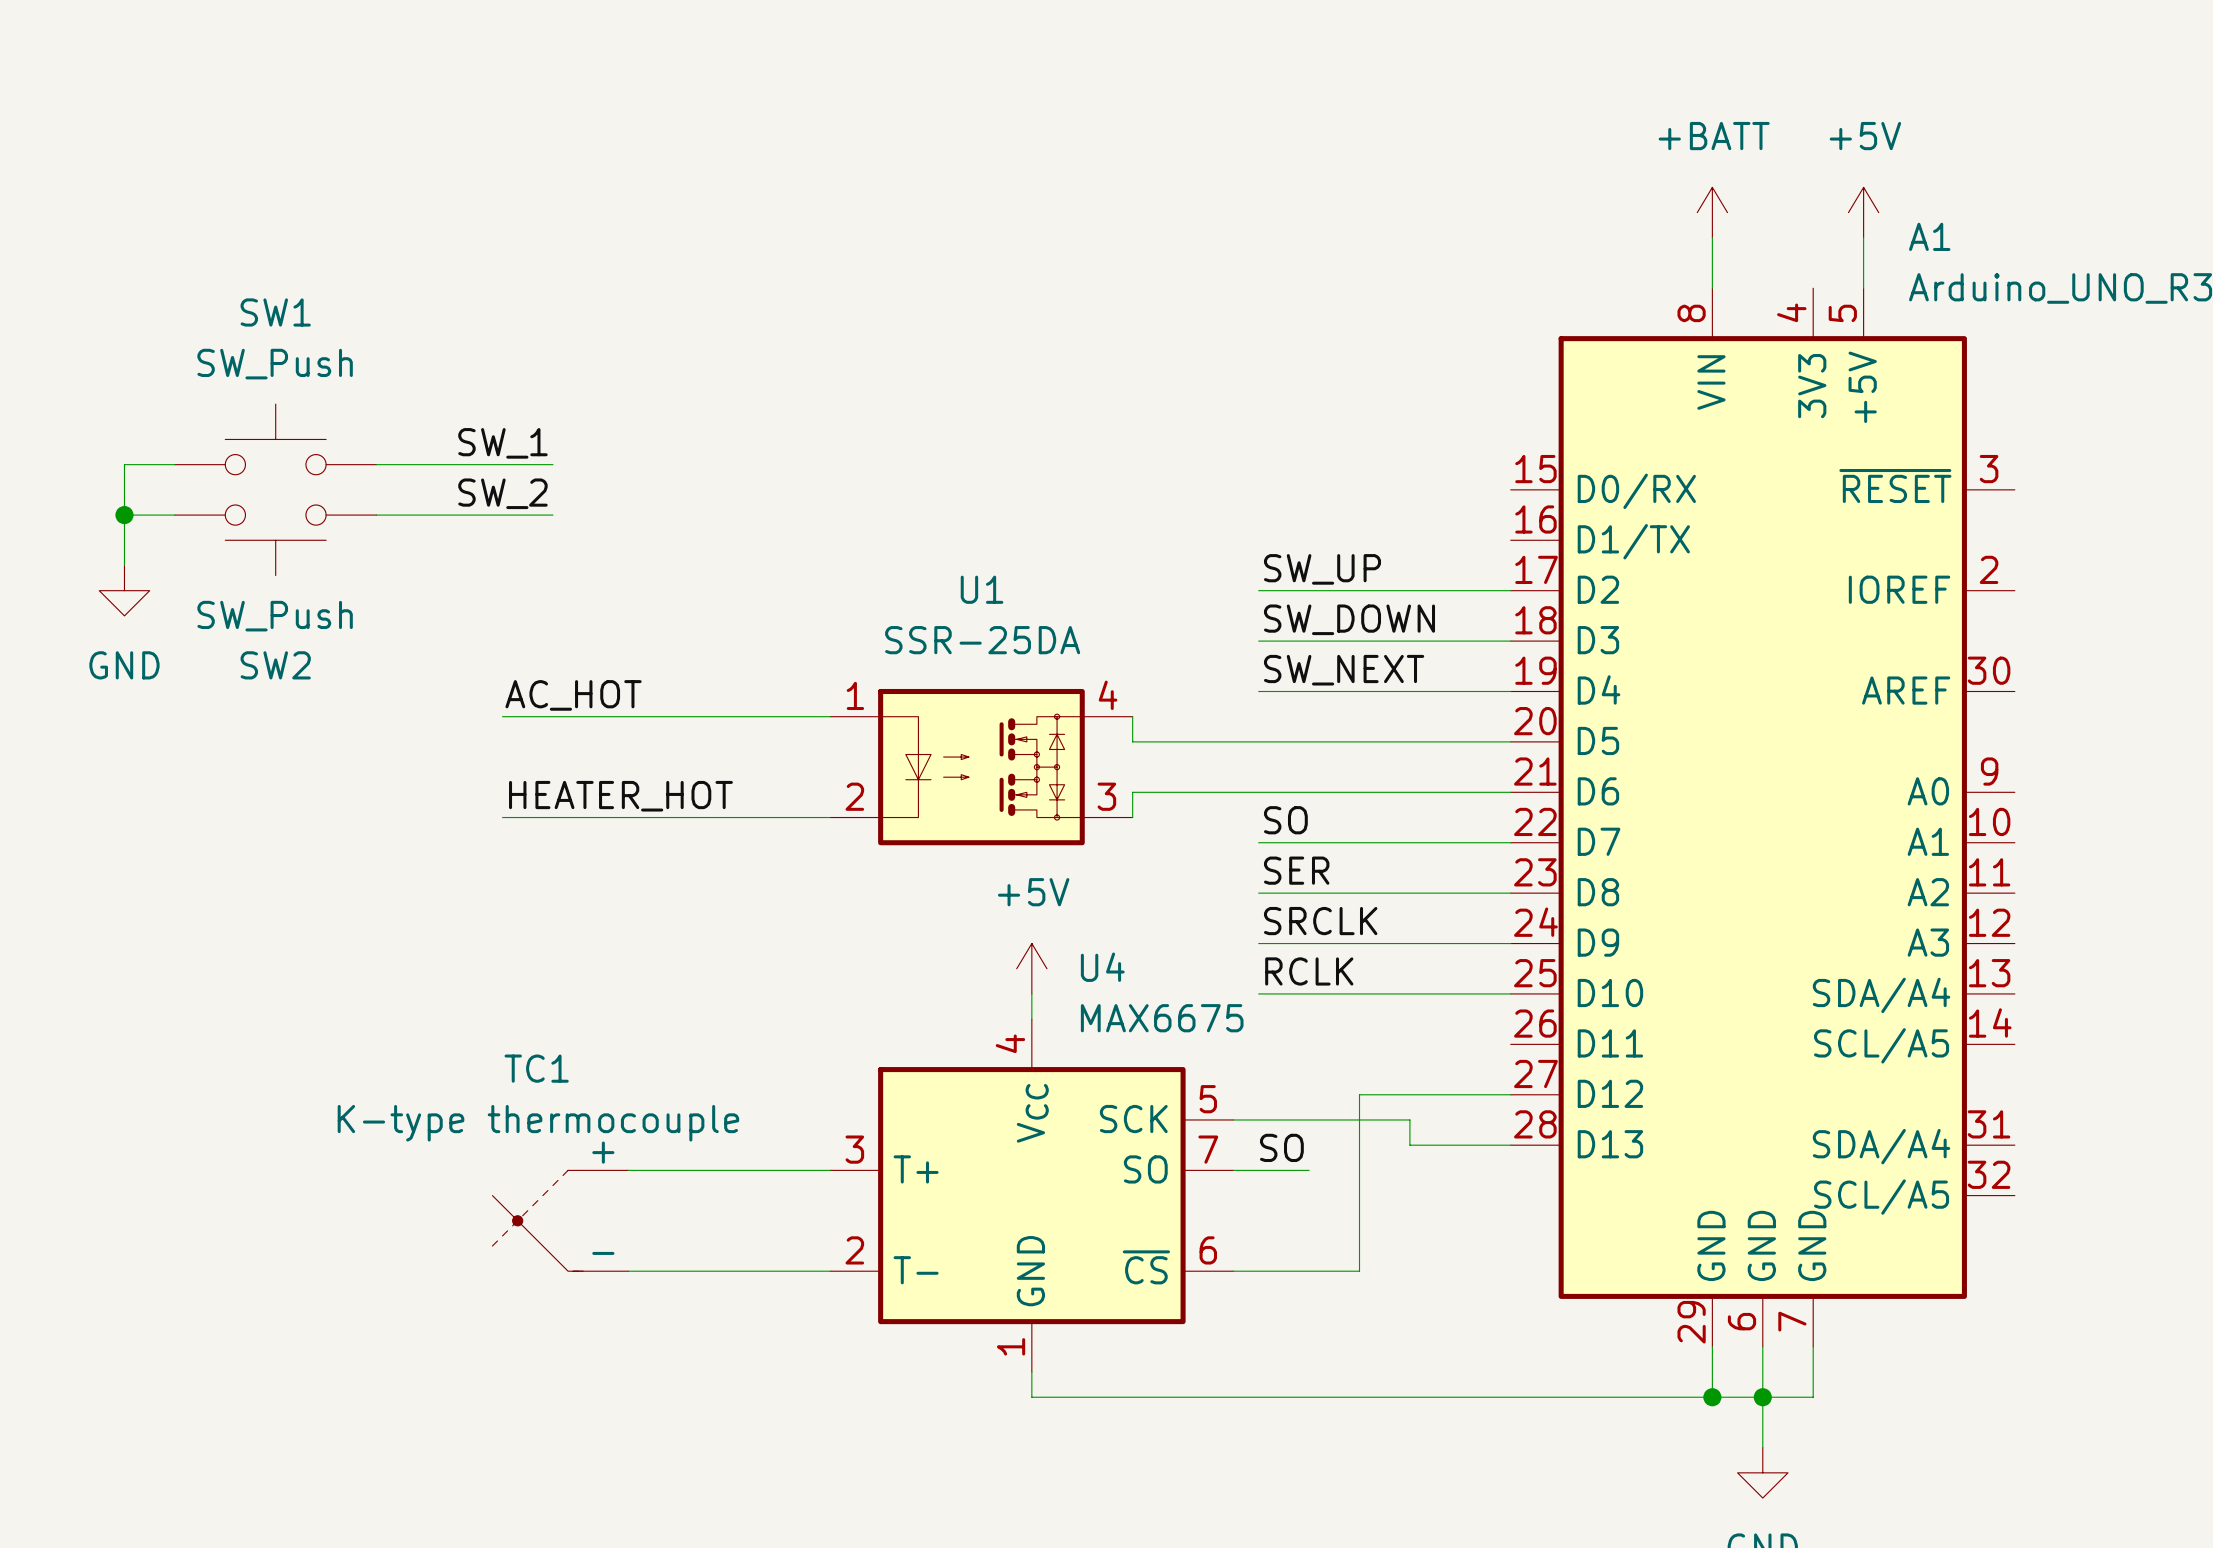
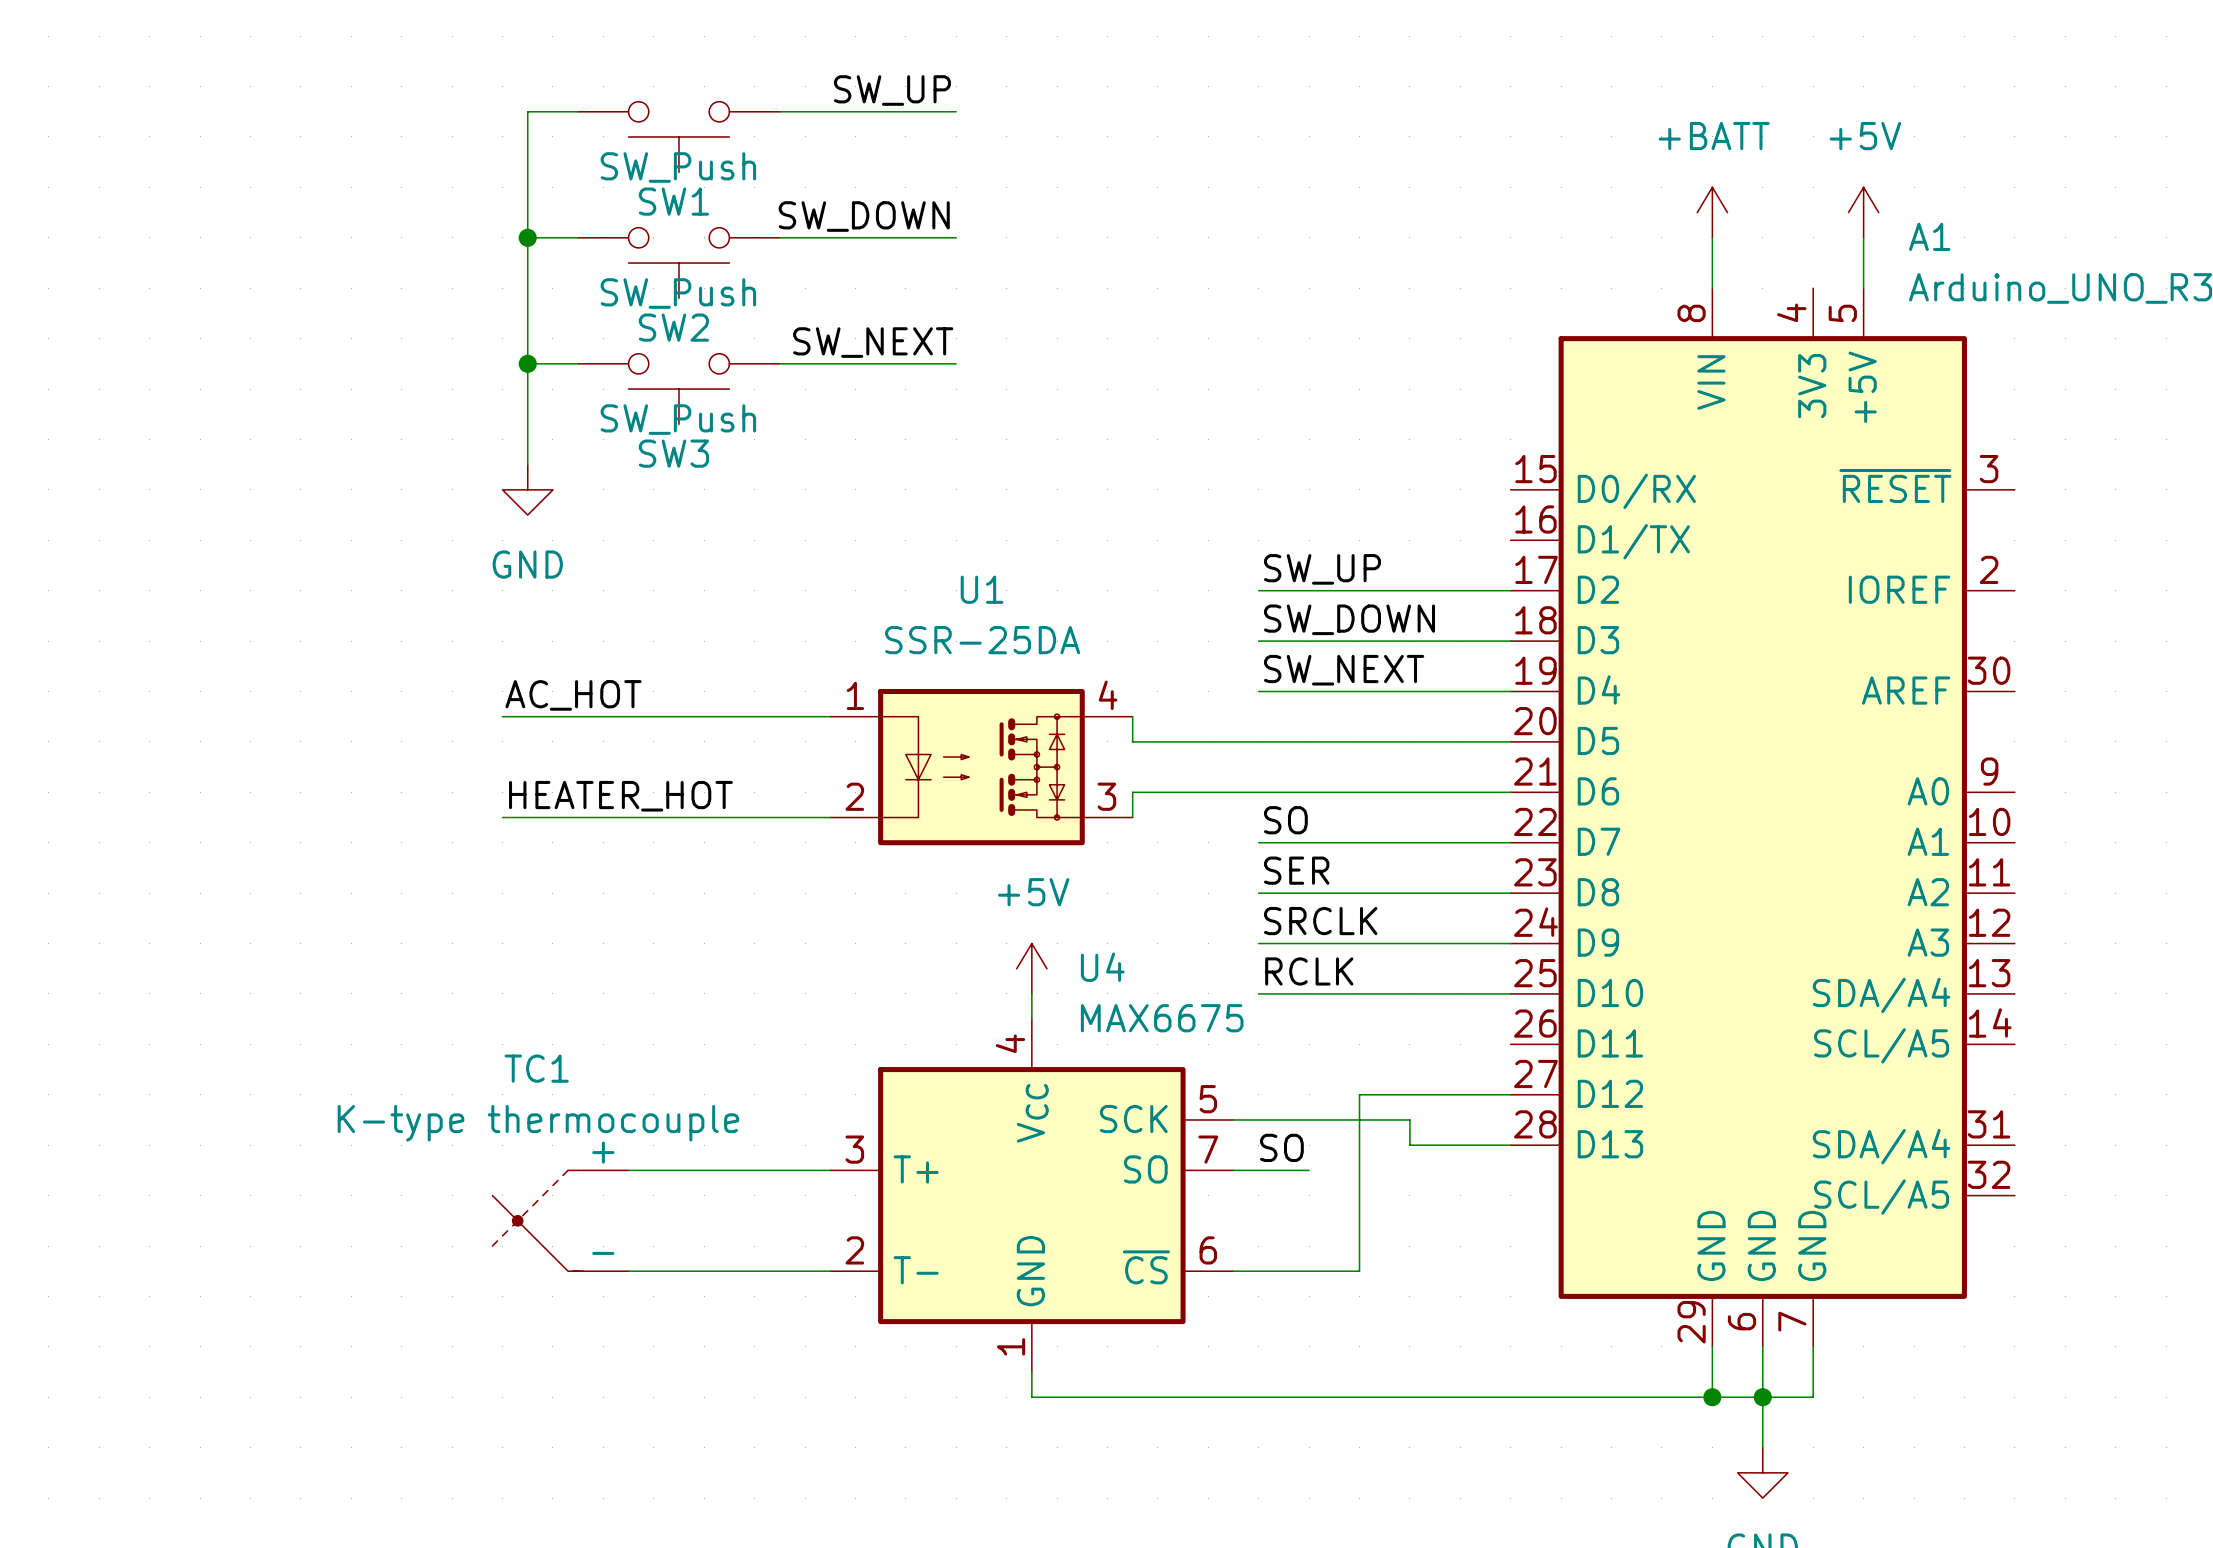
label: none -> SW_UP (892, 90)
wire: none -> (578, 111) (527, 111) (527, 464)
wire: none -> (779, 111) (956, 111)
label: none -> SW_DOWN (864, 216)
wire: none -> (527, 237) (578, 237)
junction: none -> (527, 237)
SW1 name position: SW1 (275, 312) -> SW1 (673, 201)
label: none -> SW_NEXT (873, 342)
junction: none -> (527, 363)
SW1 value position: SW_Push (275, 364) -> SW_Push (678, 167)
SW3: none -> SW_Push (678, 389)
SW1 rotation: 0° (275, 439) -> 180° (678, 136)
SW1 position: (275, 439) -> (678, 136)
label: SW_1 (502, 443) -> none
wire: (174, 464) (124, 464) (124, 565) -> none
wire: (376, 464) (552, 464) -> (779, 237) (956, 237)
label: SW_2 (502, 493) -> none
wire: (124, 515) (174, 515) -> (527, 363) (578, 363)
junction: (124, 515) -> none
wire: (376, 515) (552, 515) -> (779, 363) (956, 363)
SW2 position: (275, 540) -> (678, 263)
power symbol position: GND (124, 590) -> GND (527, 489)
SW2 value position: SW_Push (275, 616) -> SW_Push (678, 293)
SW2 name position: SW2 (275, 665) -> SW2 (673, 327)

